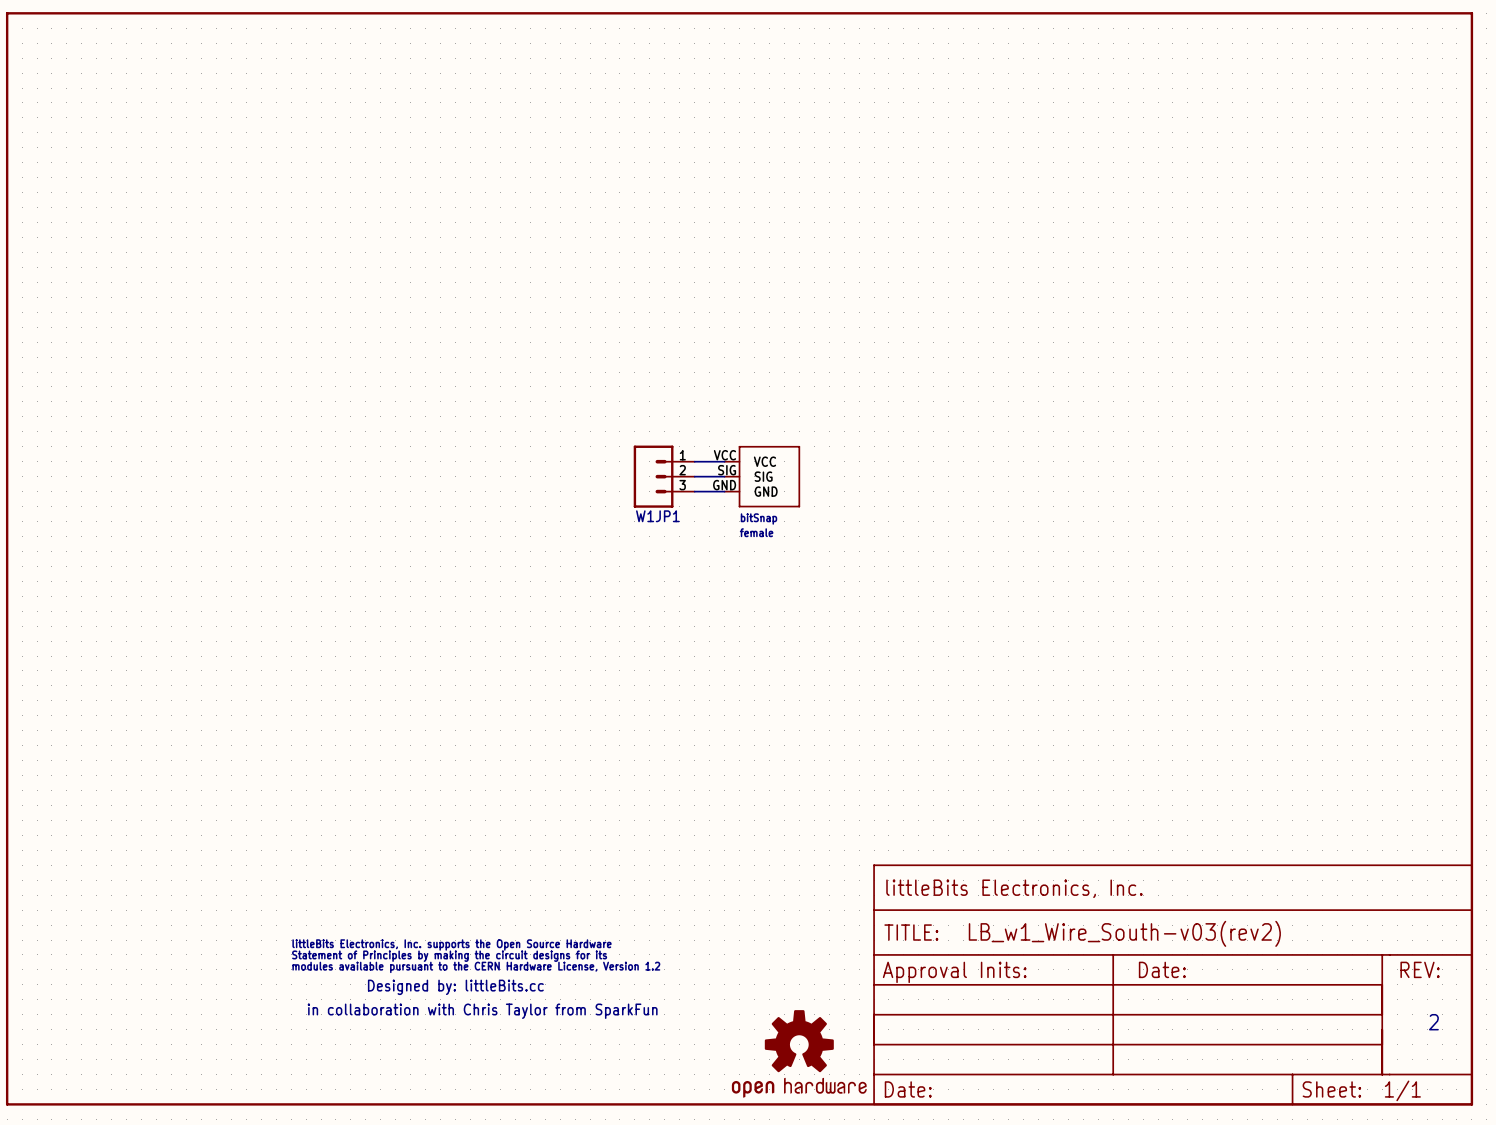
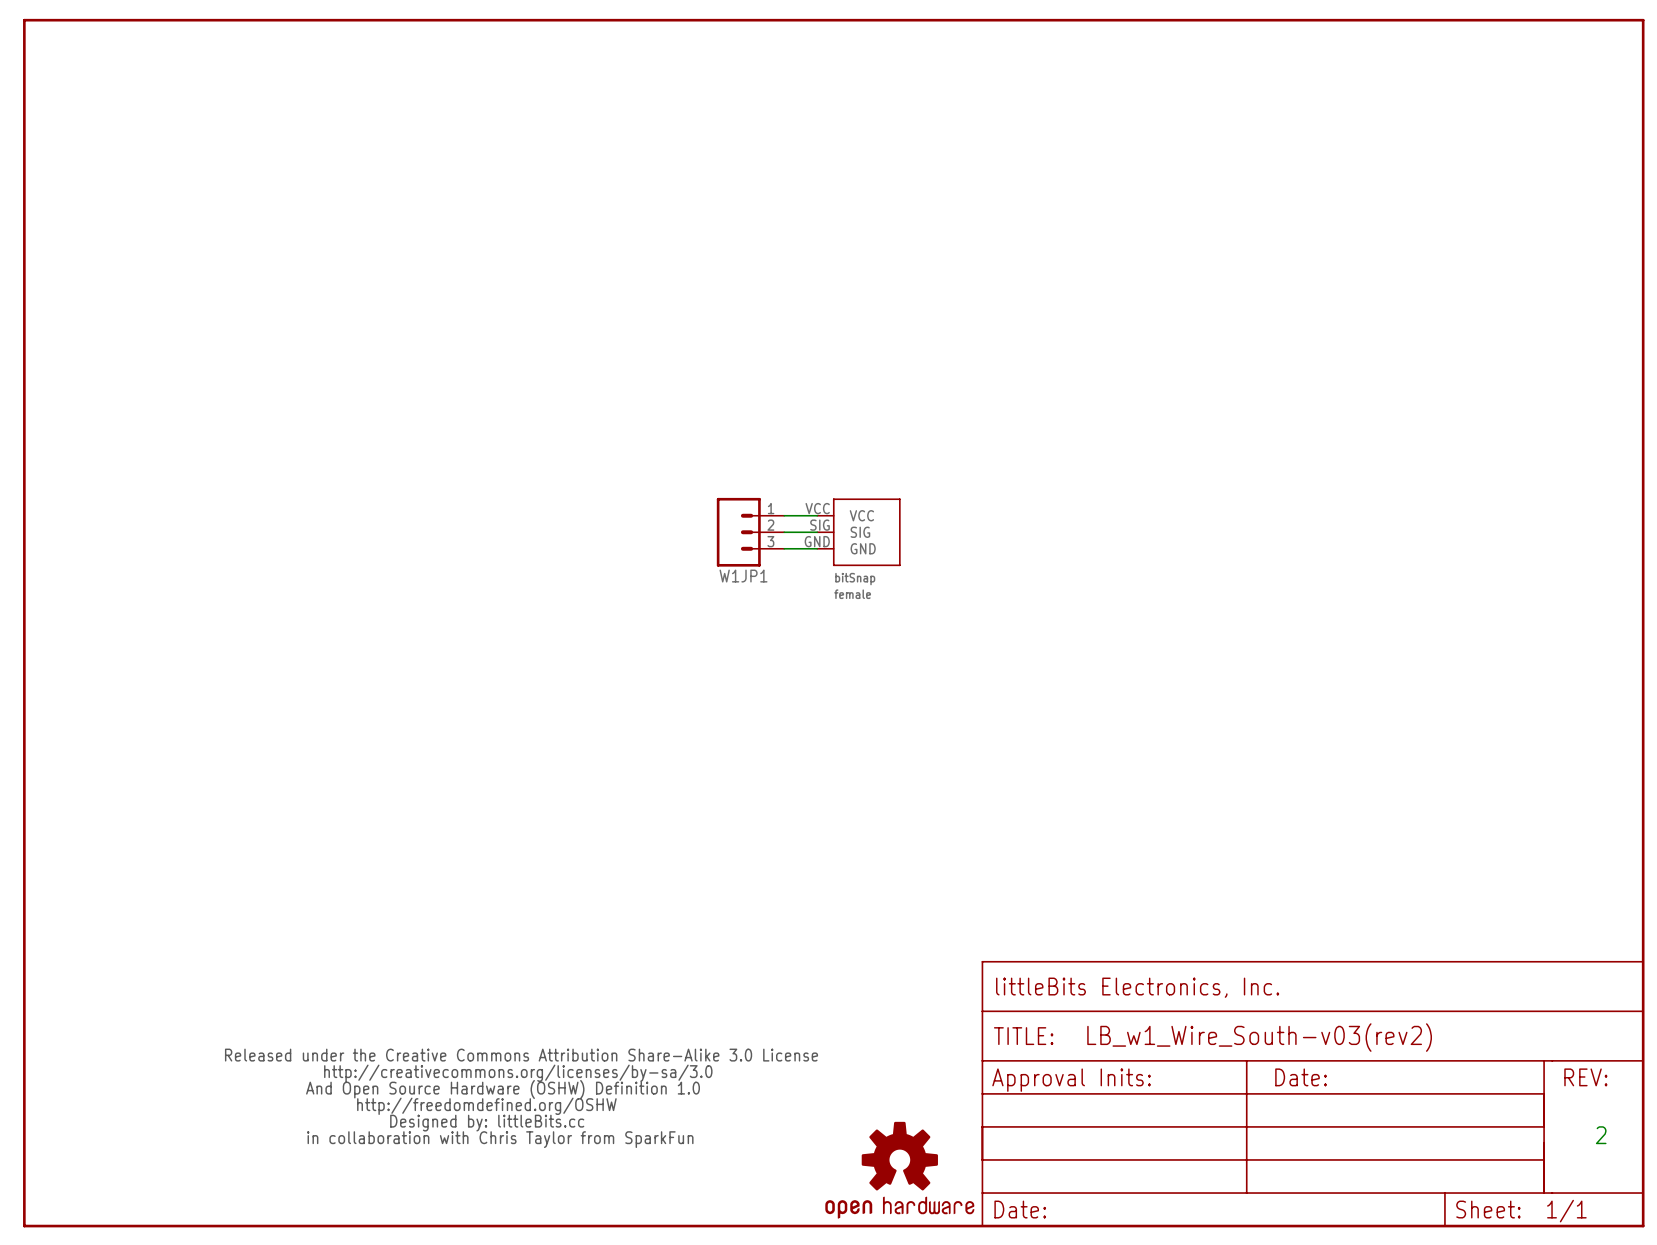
part: (476, 967) -> none
part: none -> (521, 1098)
text: in collaboration with Chris Taylor from SparkFun (482, 1011) -> none

